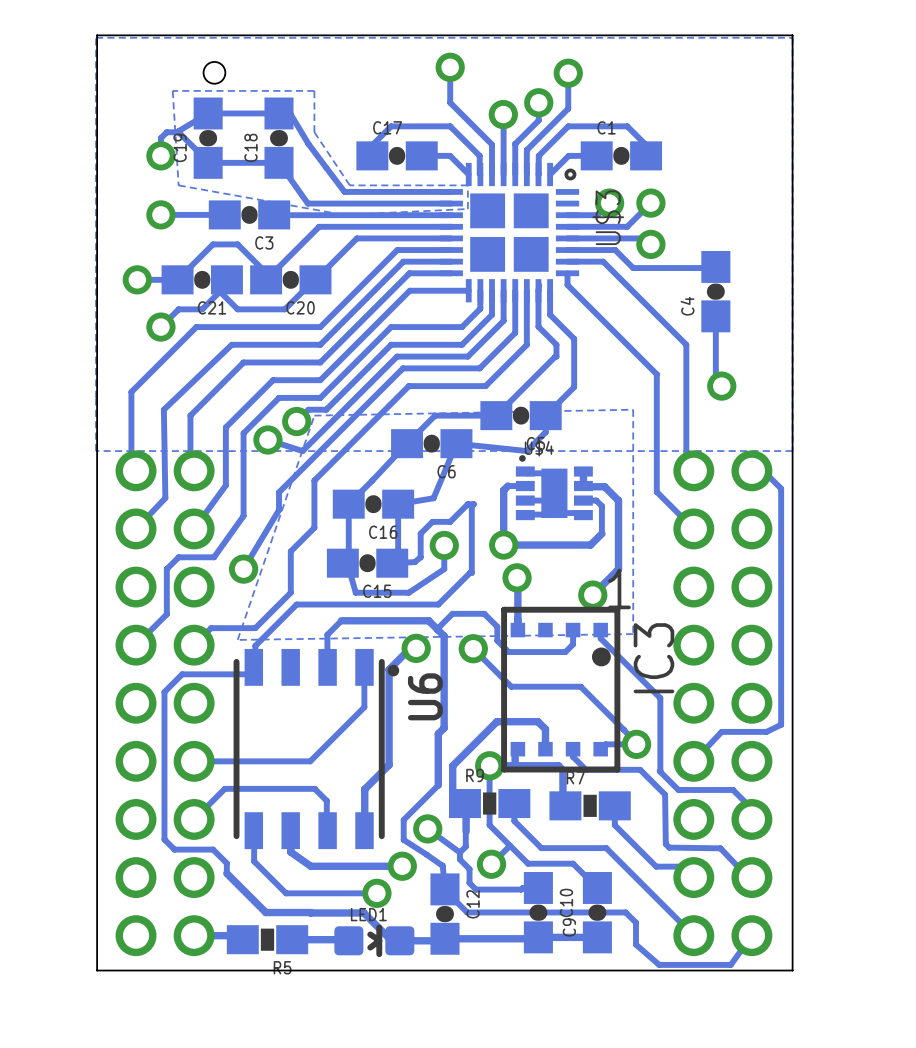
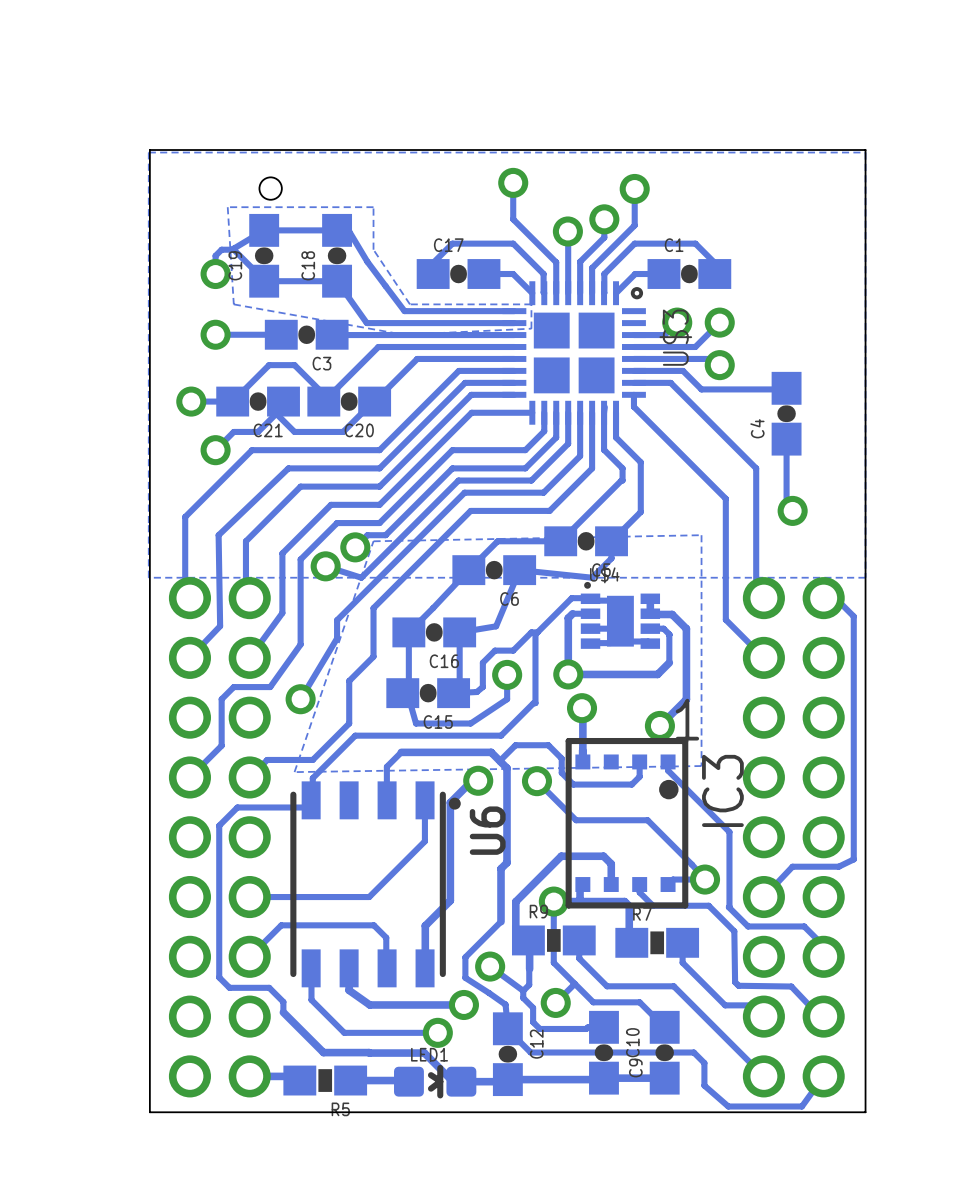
track: none -> (589, 598) (571, 598) (537, 632)

